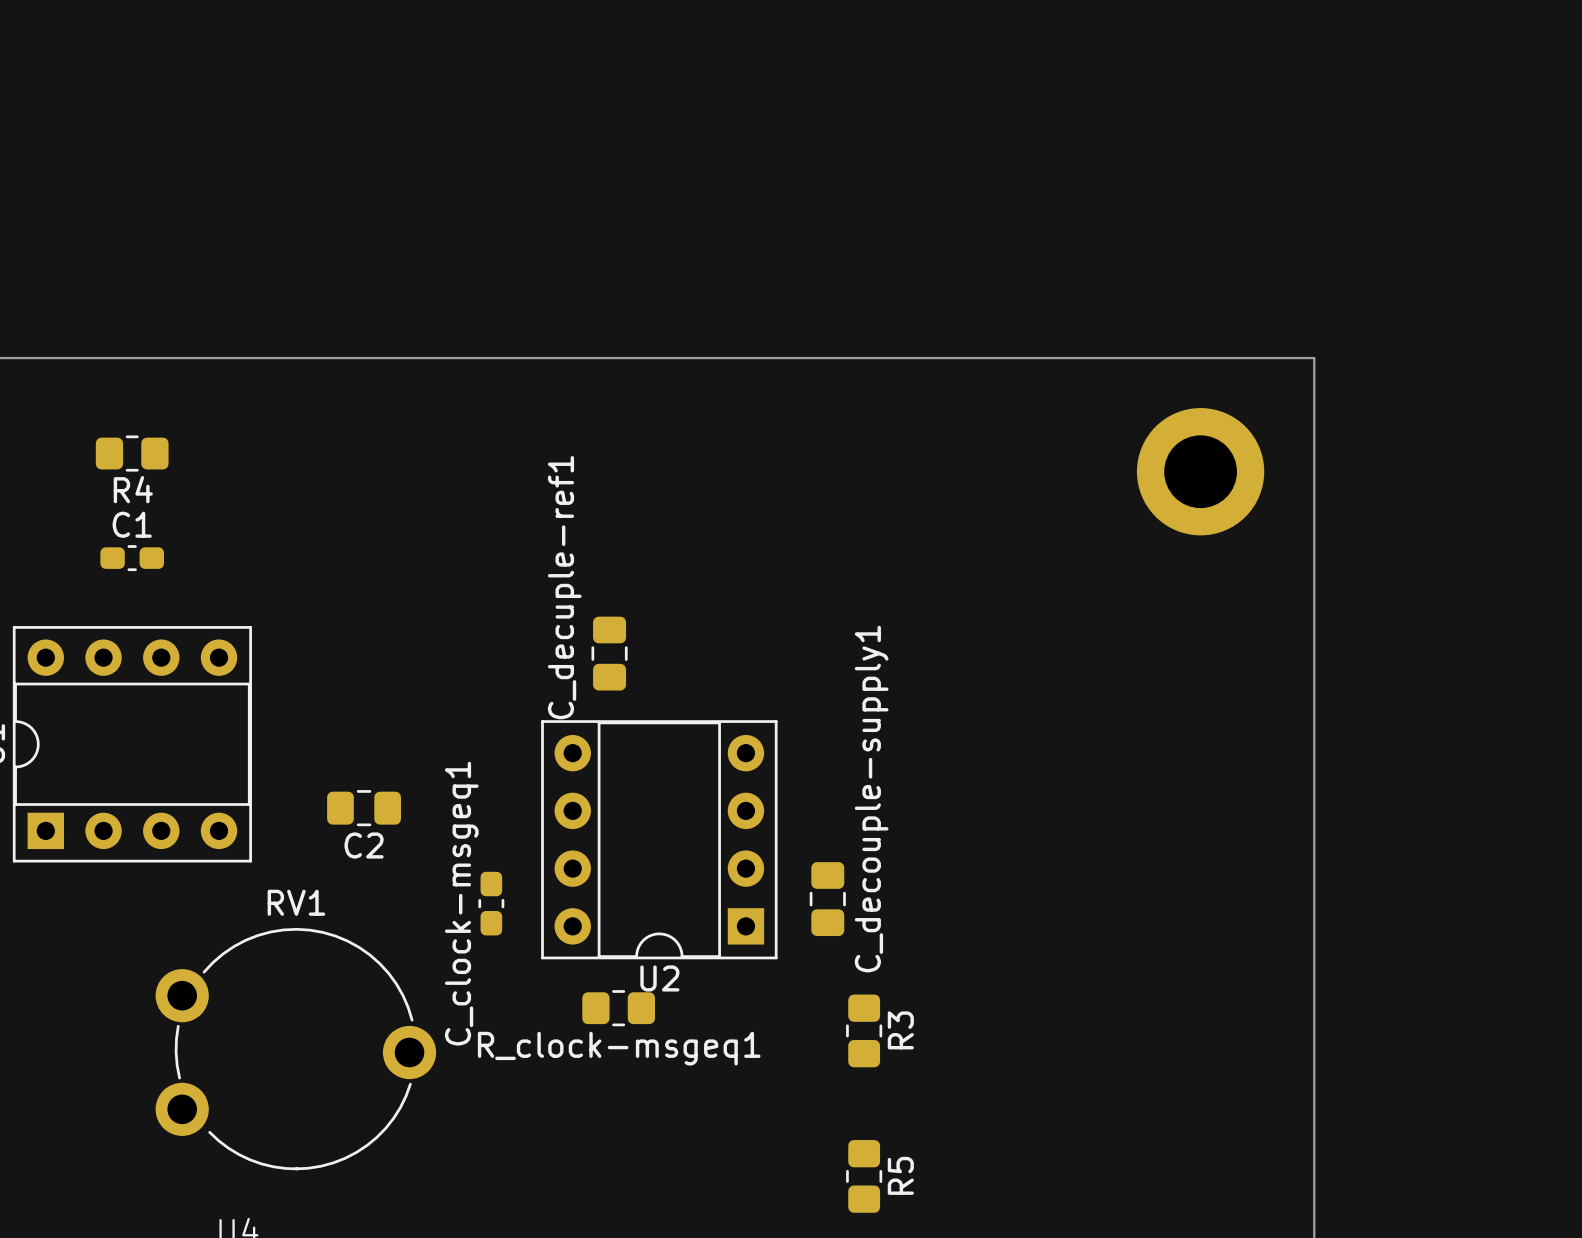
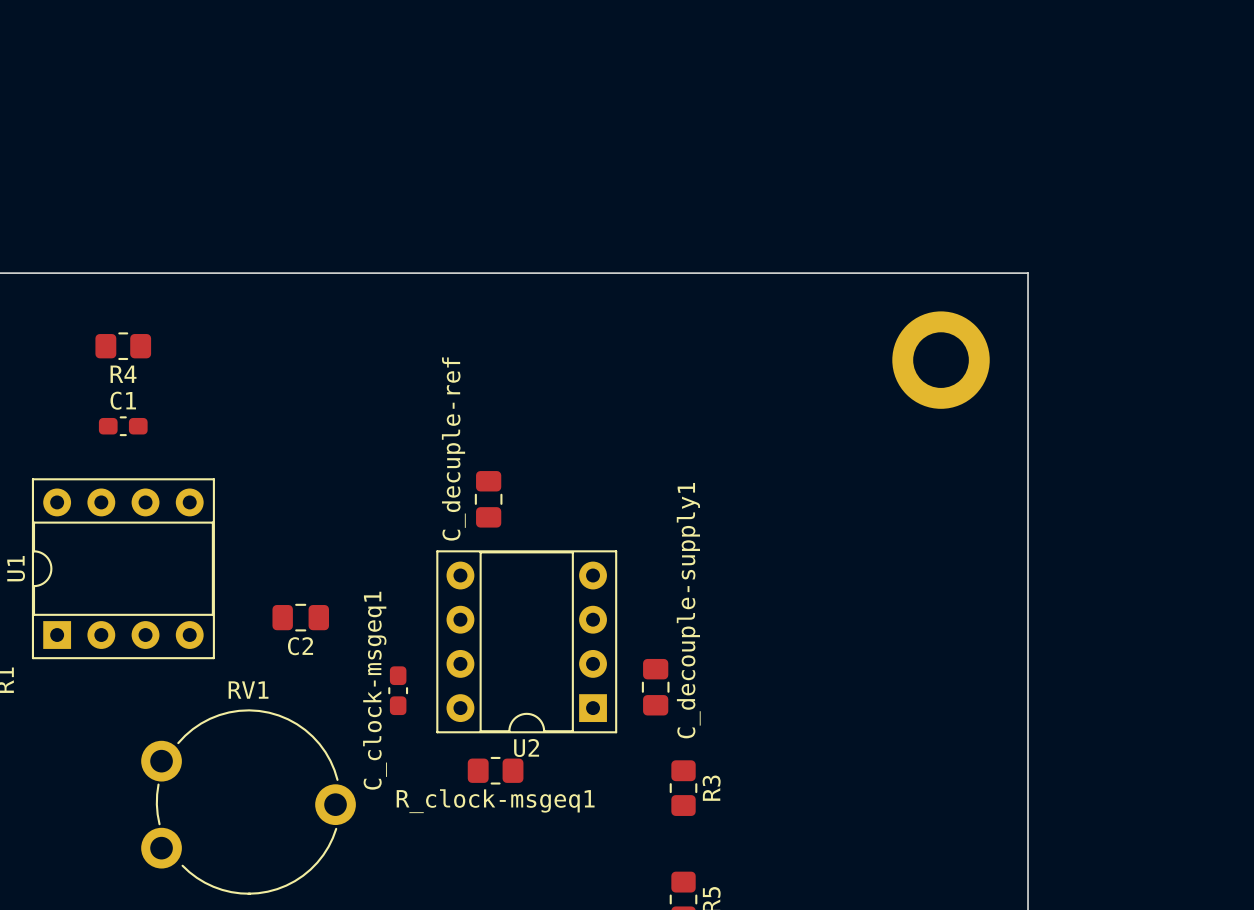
C_decuple-ref1 name: C_decuple-ref1 (564, 587) -> C_decuple-ref (453, 449)

